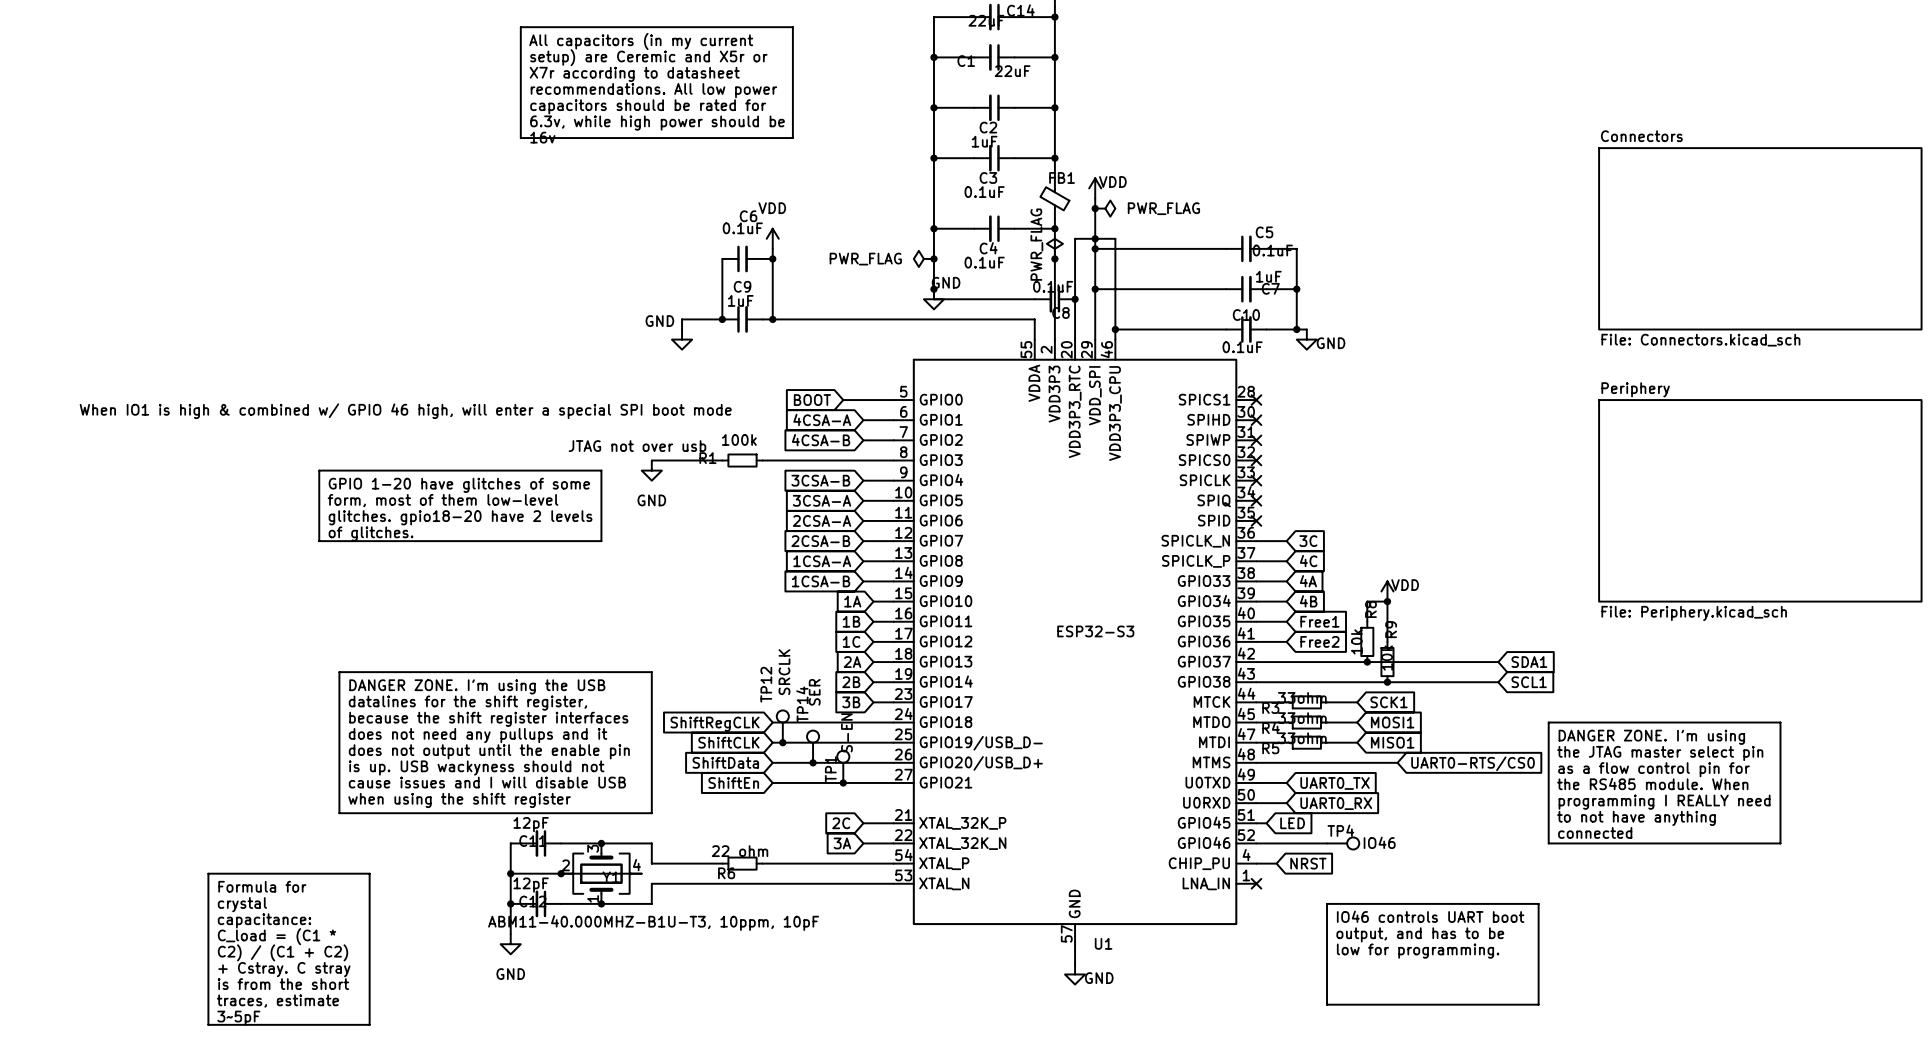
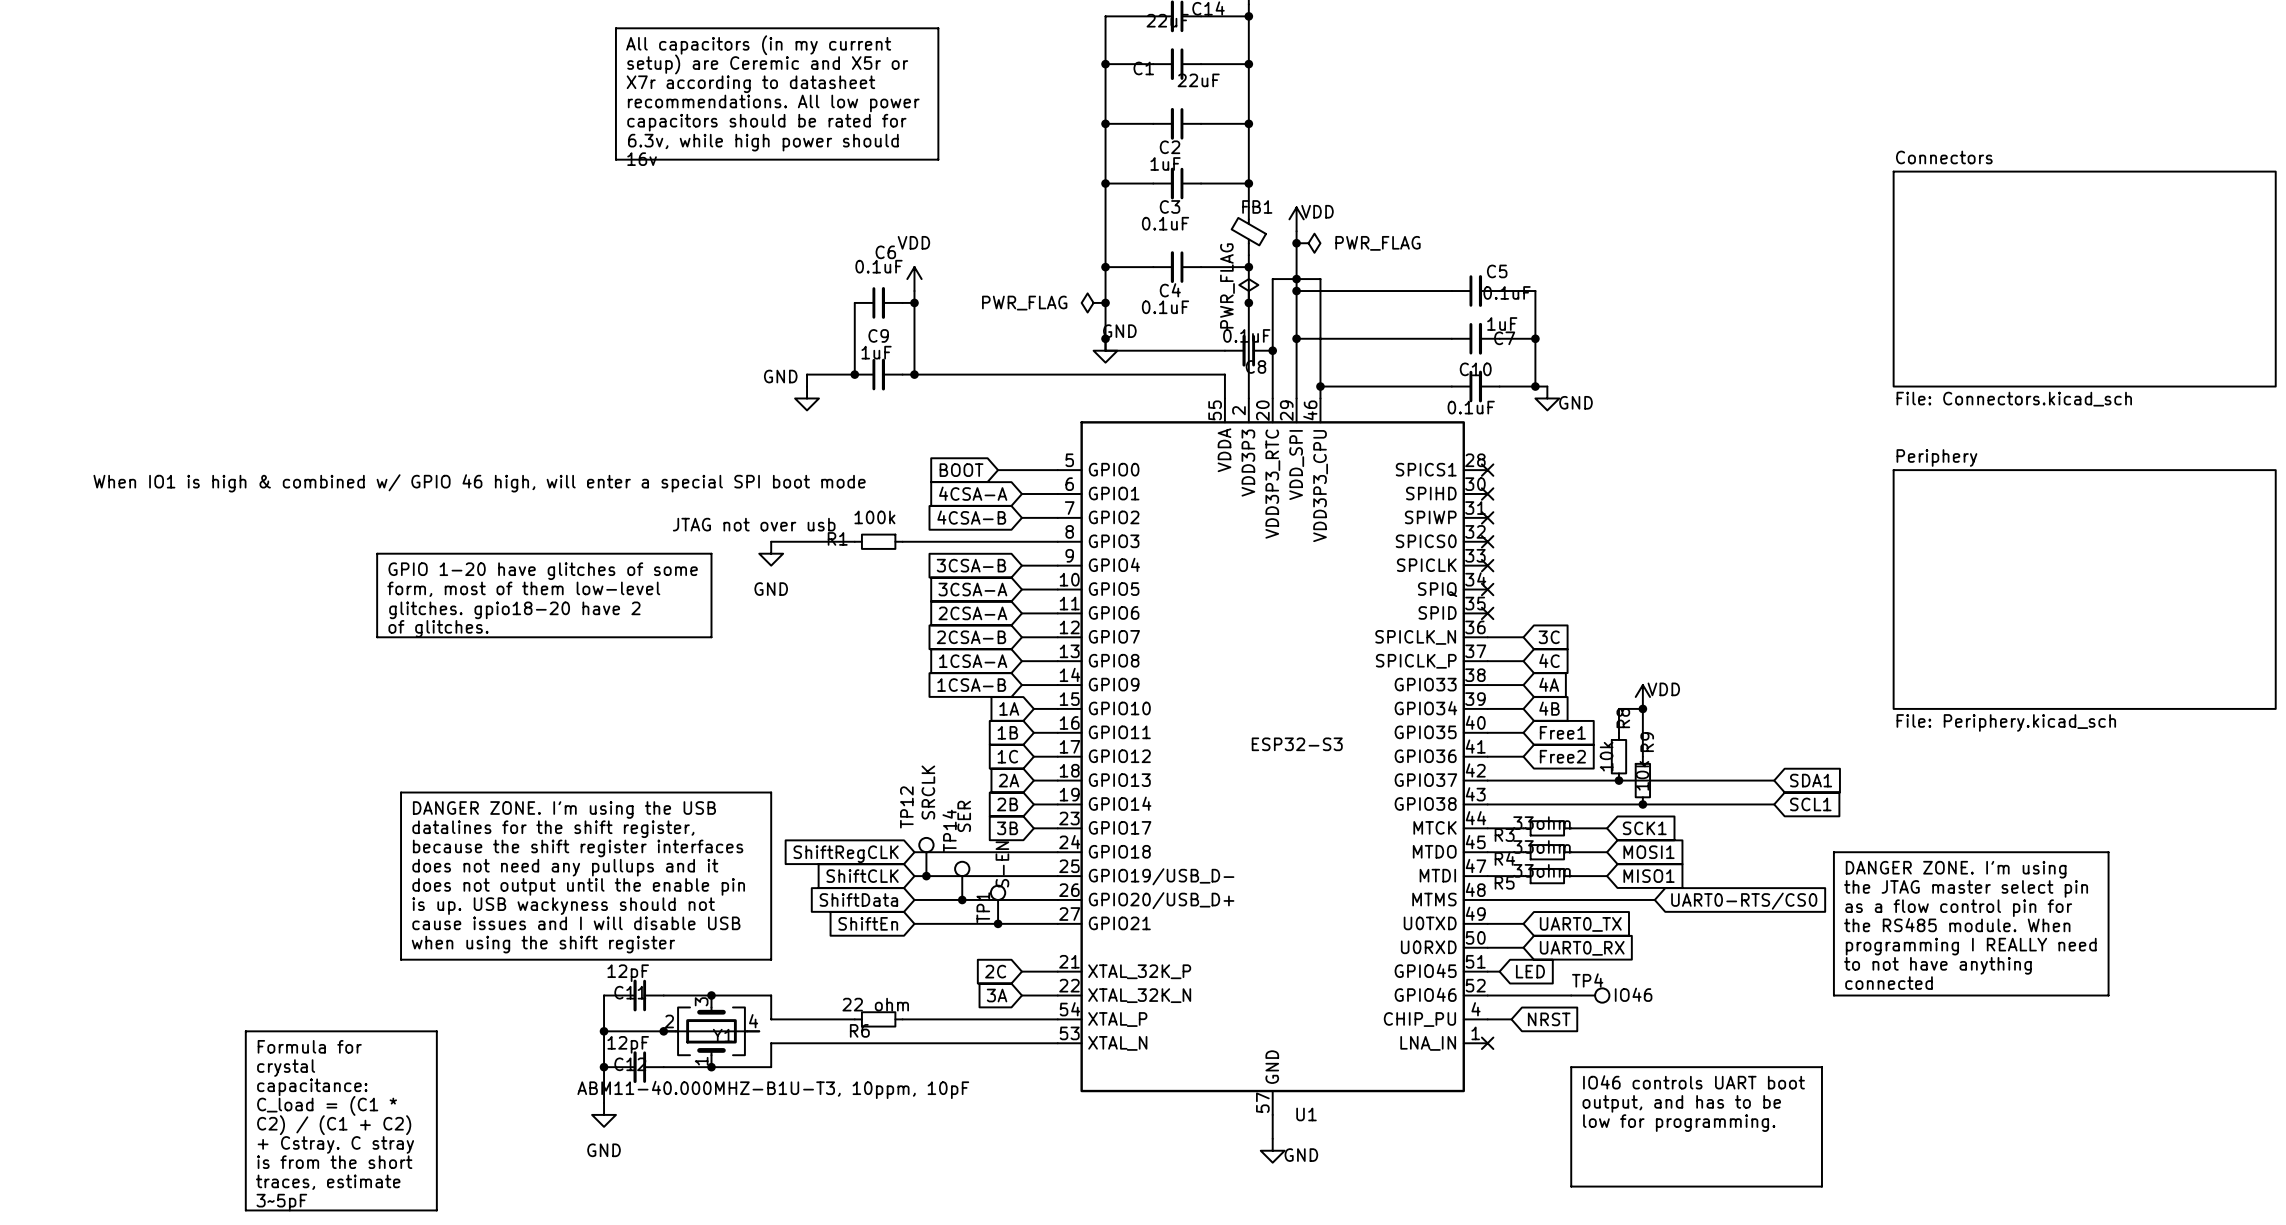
text: 6.3v, while high power should be (657, 123) -> 6.3v, while high power should (763, 142)
text: glitches. gpio18-20 have 2 levels (460, 517) -> glitches. gpio18-20 have 2 (514, 610)

